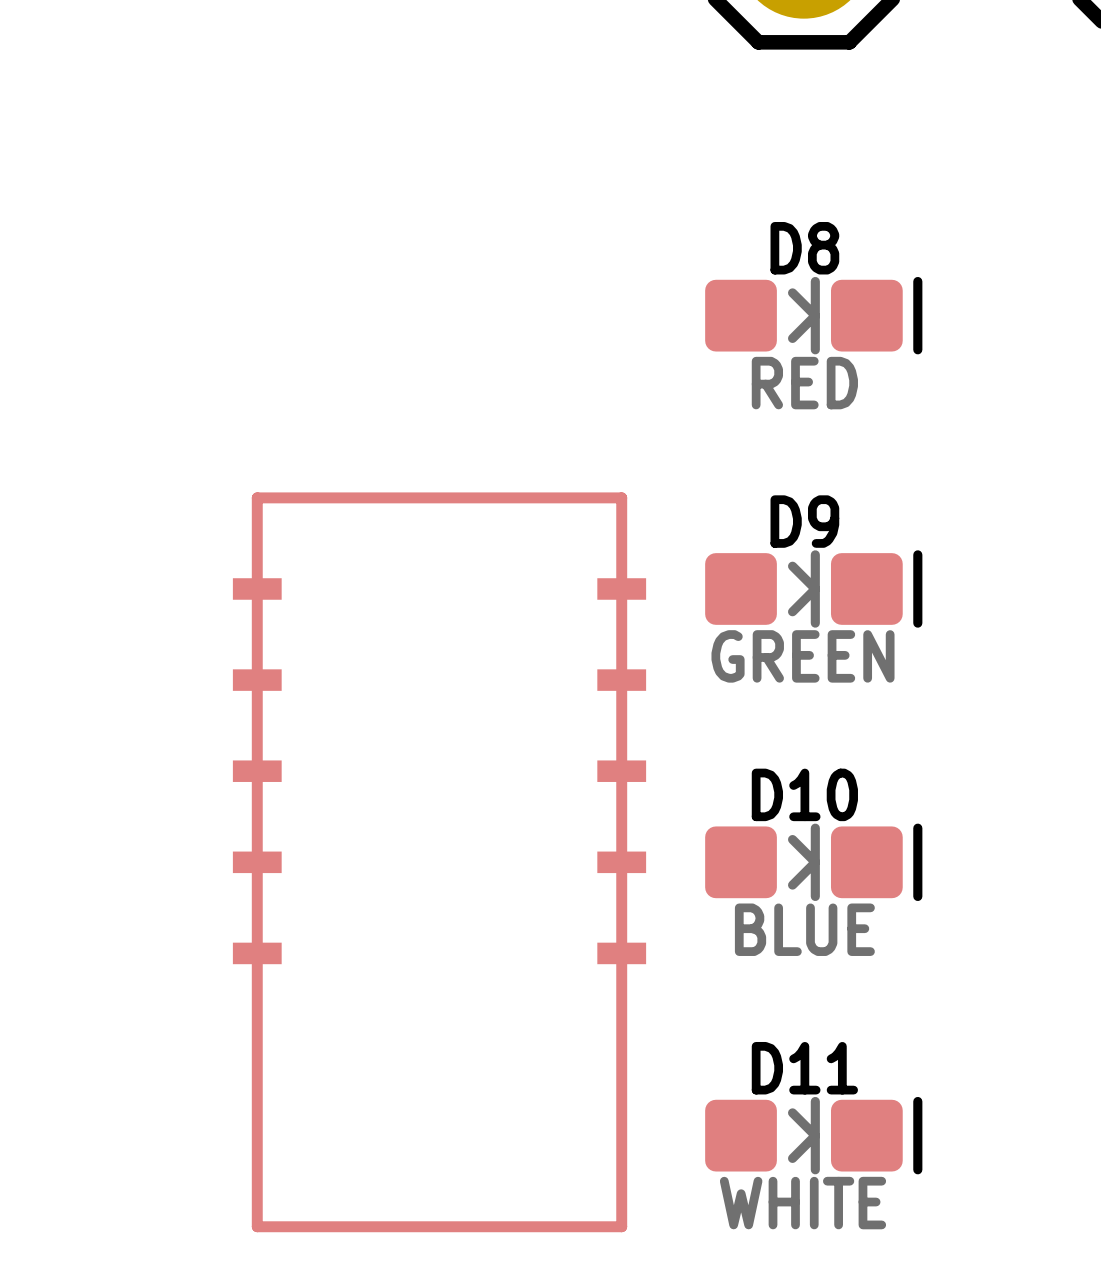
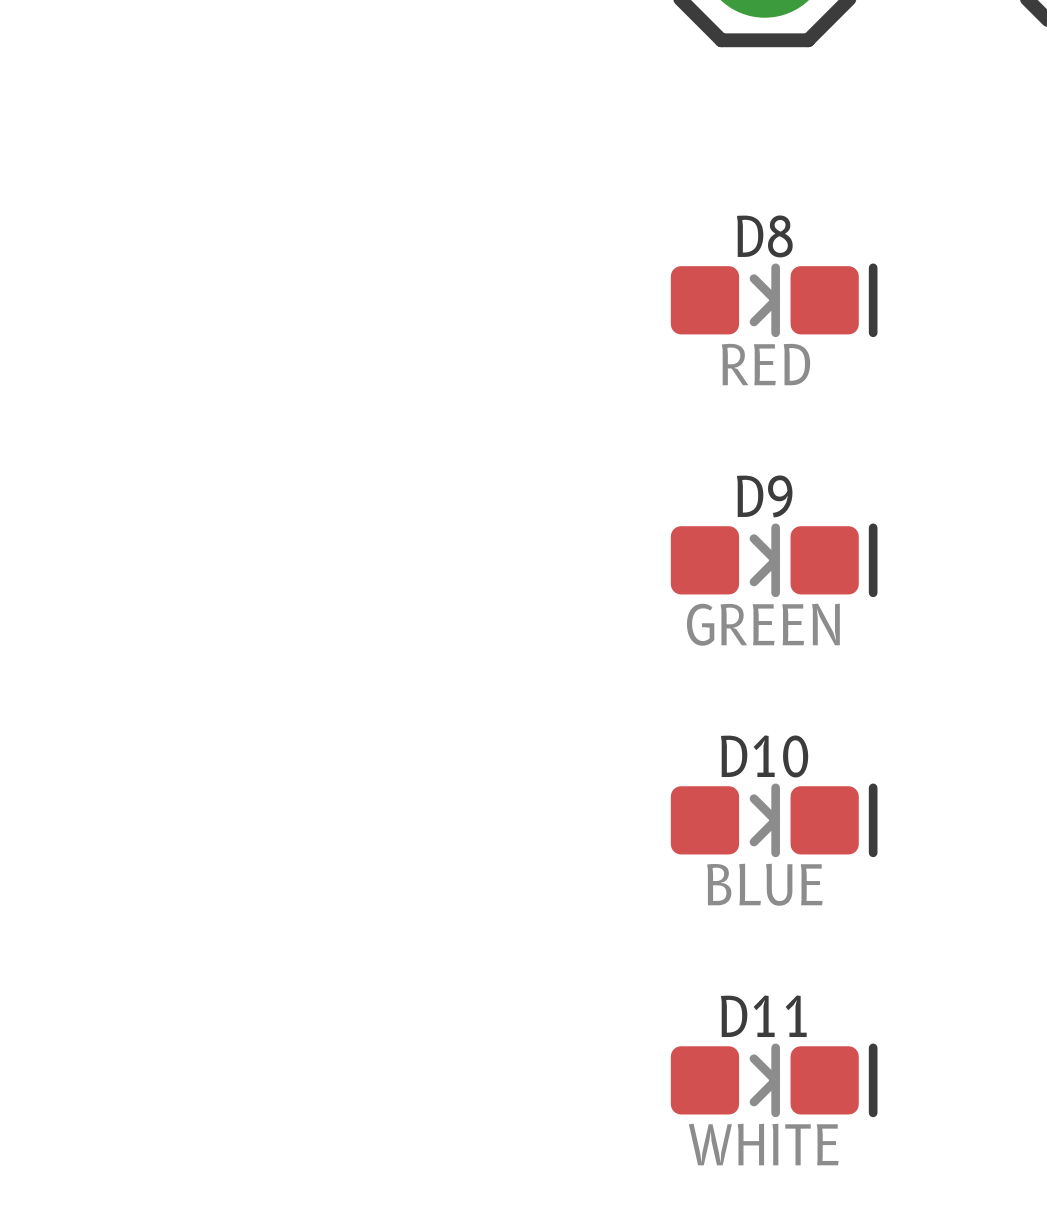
part: (439, 862) -> none

